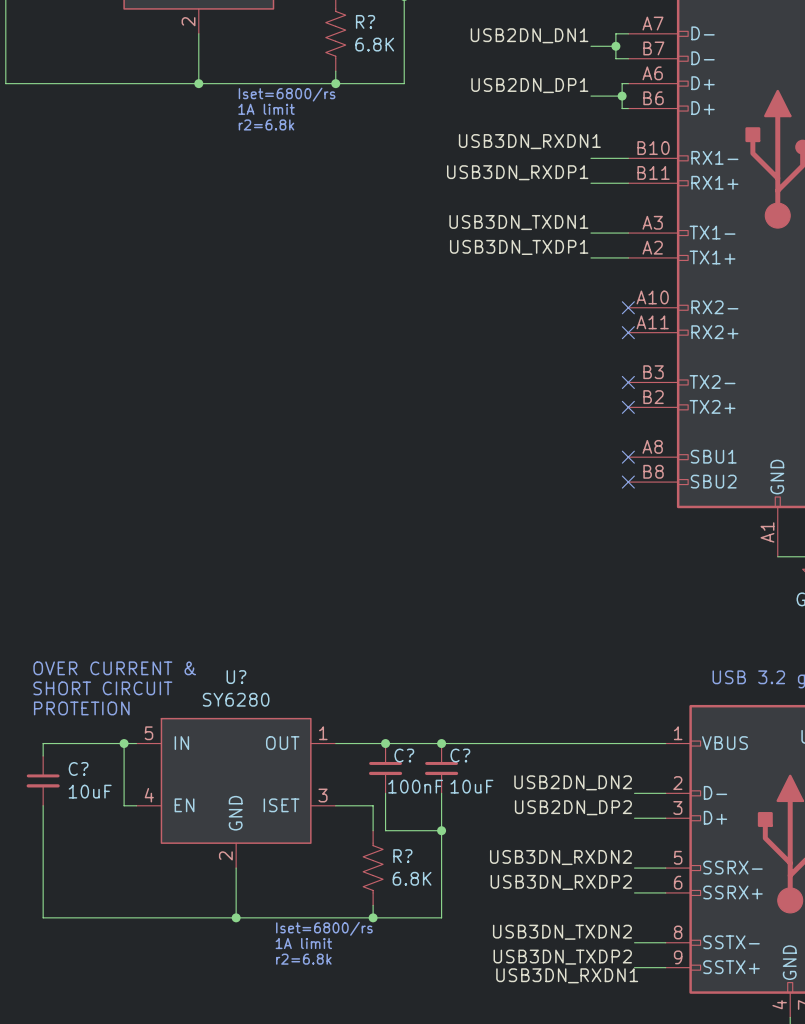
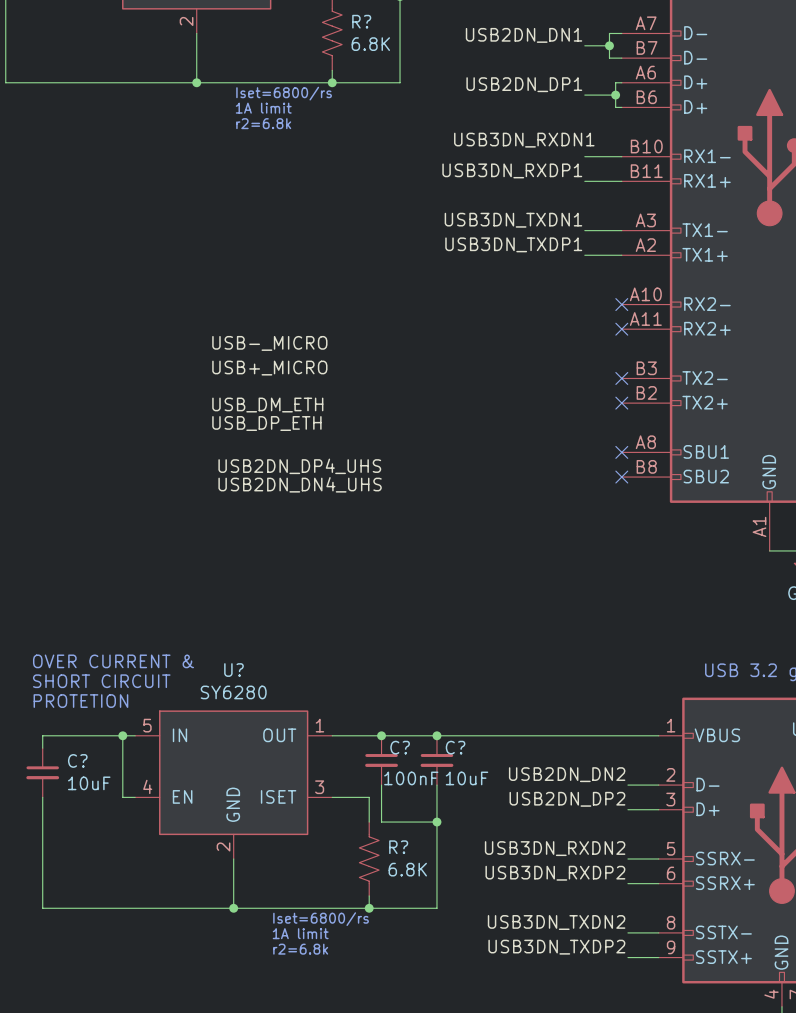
label: none -> USB-_MICRO (269, 343)
label: none -> USB+_MICRO (269, 368)
label: none -> USB_DM_ETH (267, 405)
label: none -> USB_DP_ETH (266, 423)
label: none -> USB2DN_DP4_UHS (299, 466)
label: none -> USB2DN_DN4_UHS (300, 484)
label: USB3DN_RXDN1 (567, 975) -> none

